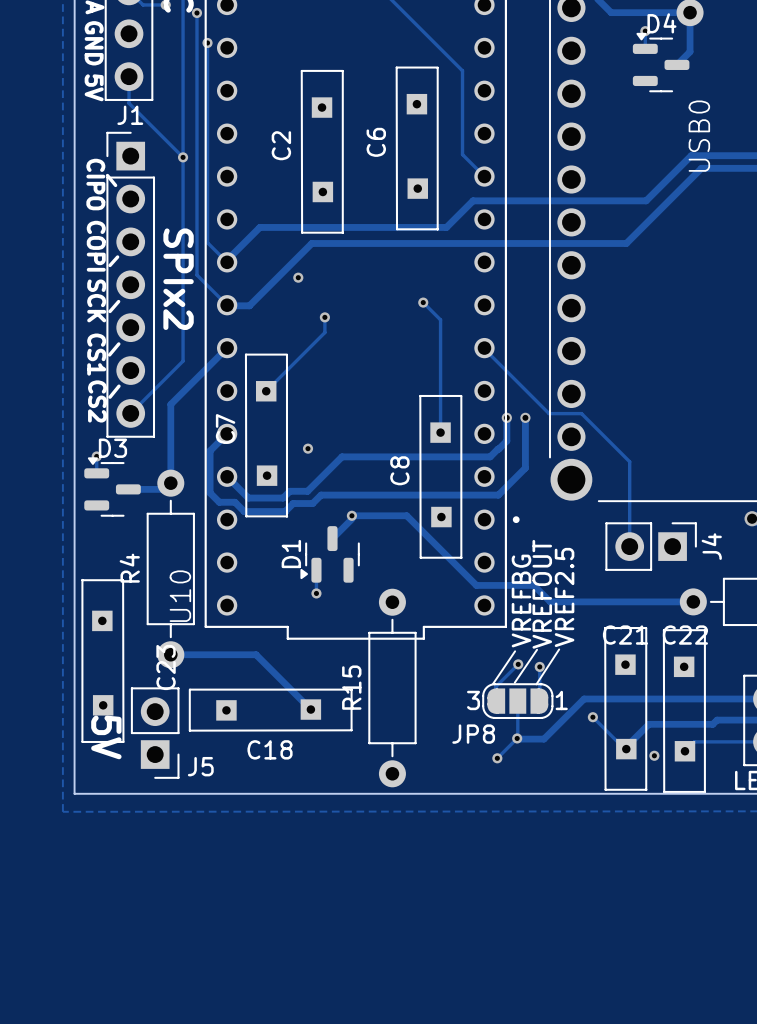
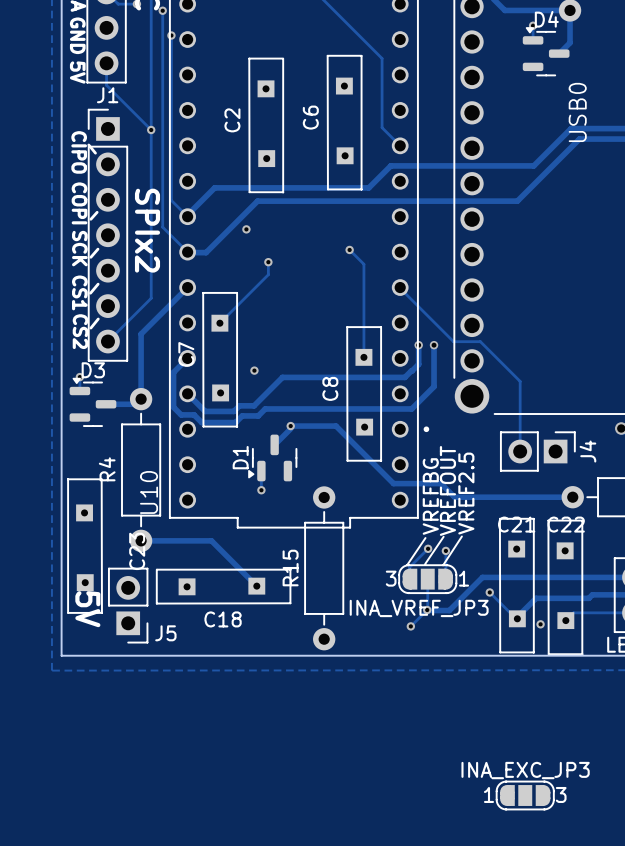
JP8 name: JP8 (473, 734) -> INA_VREF_JP3 (419, 608)
INA_EXC_JP3: none -> (525, 795)

